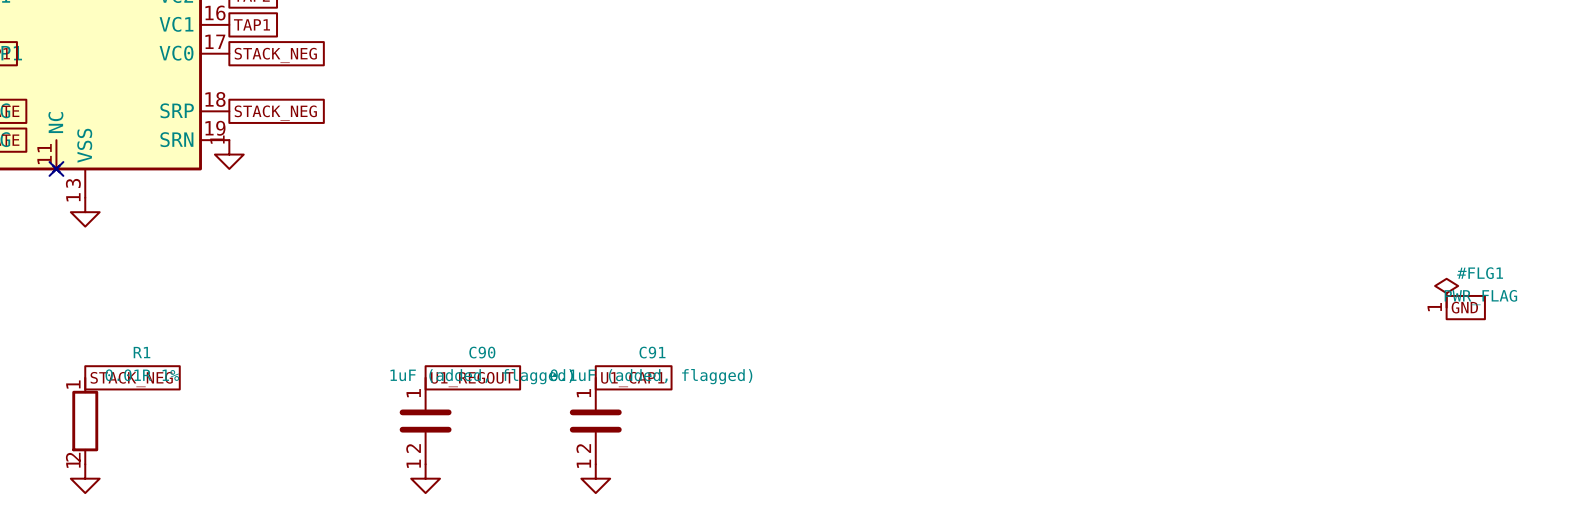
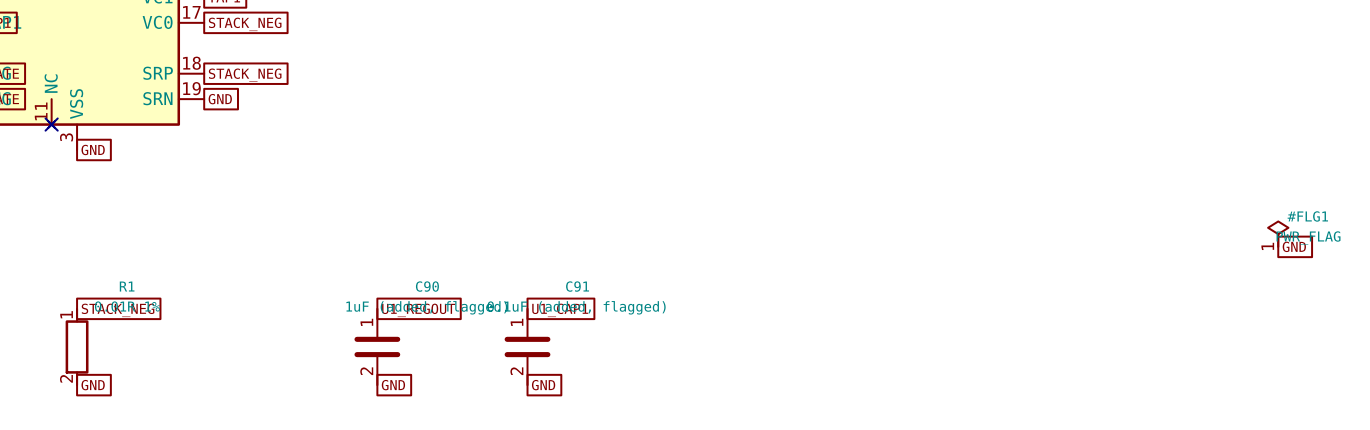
global label: none -> GND (220, 99)
power symbol: (229, 154) -> none
global label: none -> GND (93, 149)
power symbol: (85, 212) -> none
global label: none -> GND (93, 385)
global label: none -> GND (393, 385)
global label: none -> GND (543, 385)
power symbol: (85, 478) -> none
power symbol: (425, 478) -> none
power symbol: (595, 478) -> none

